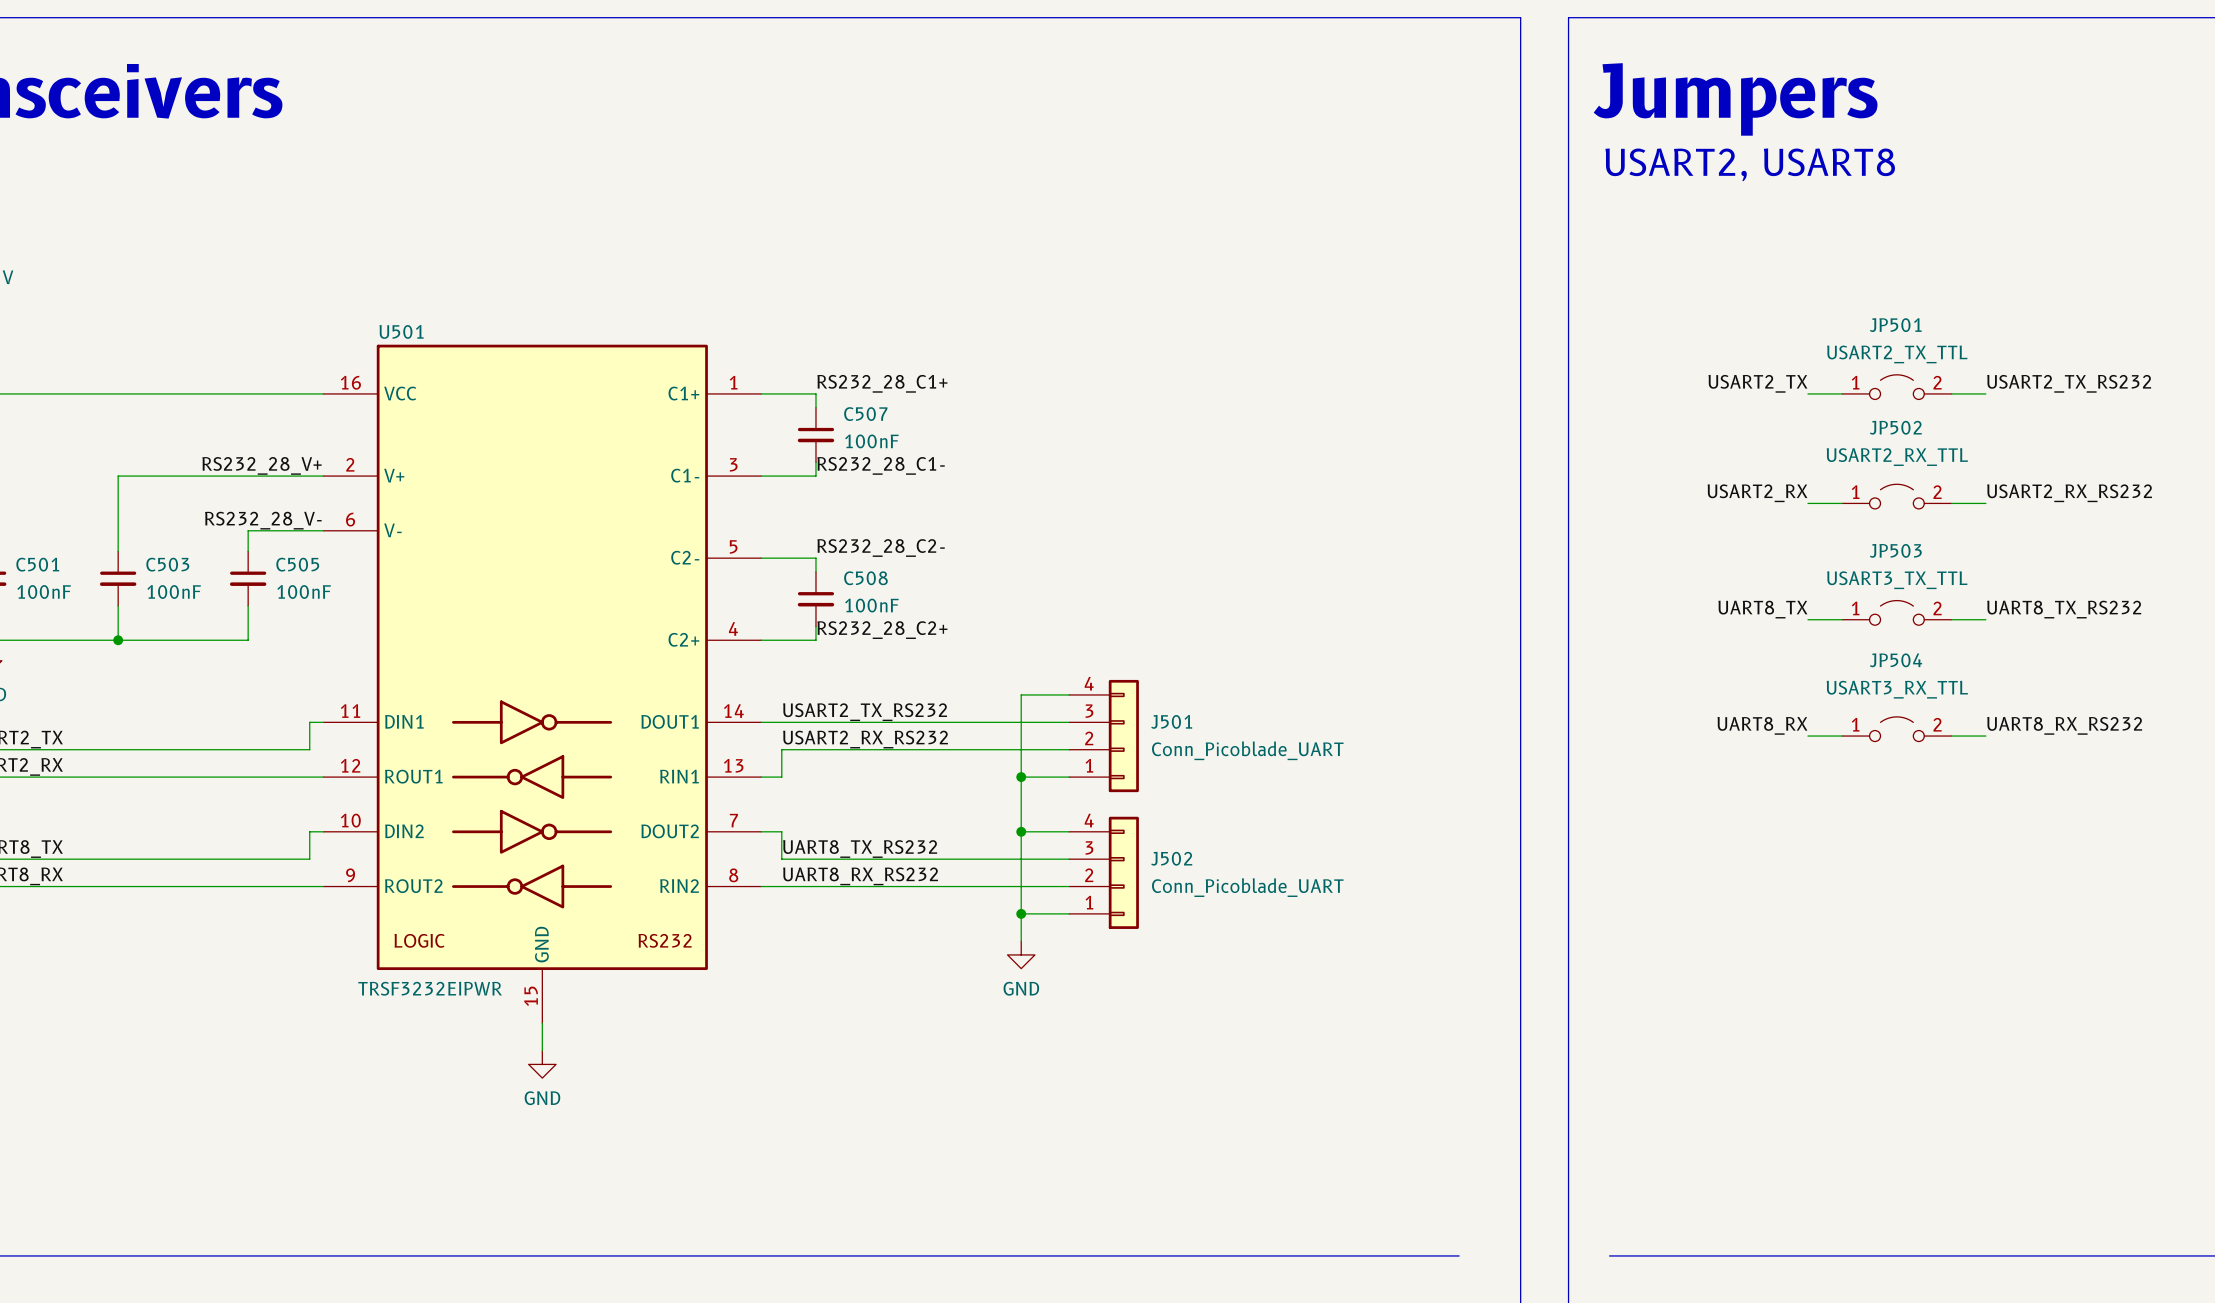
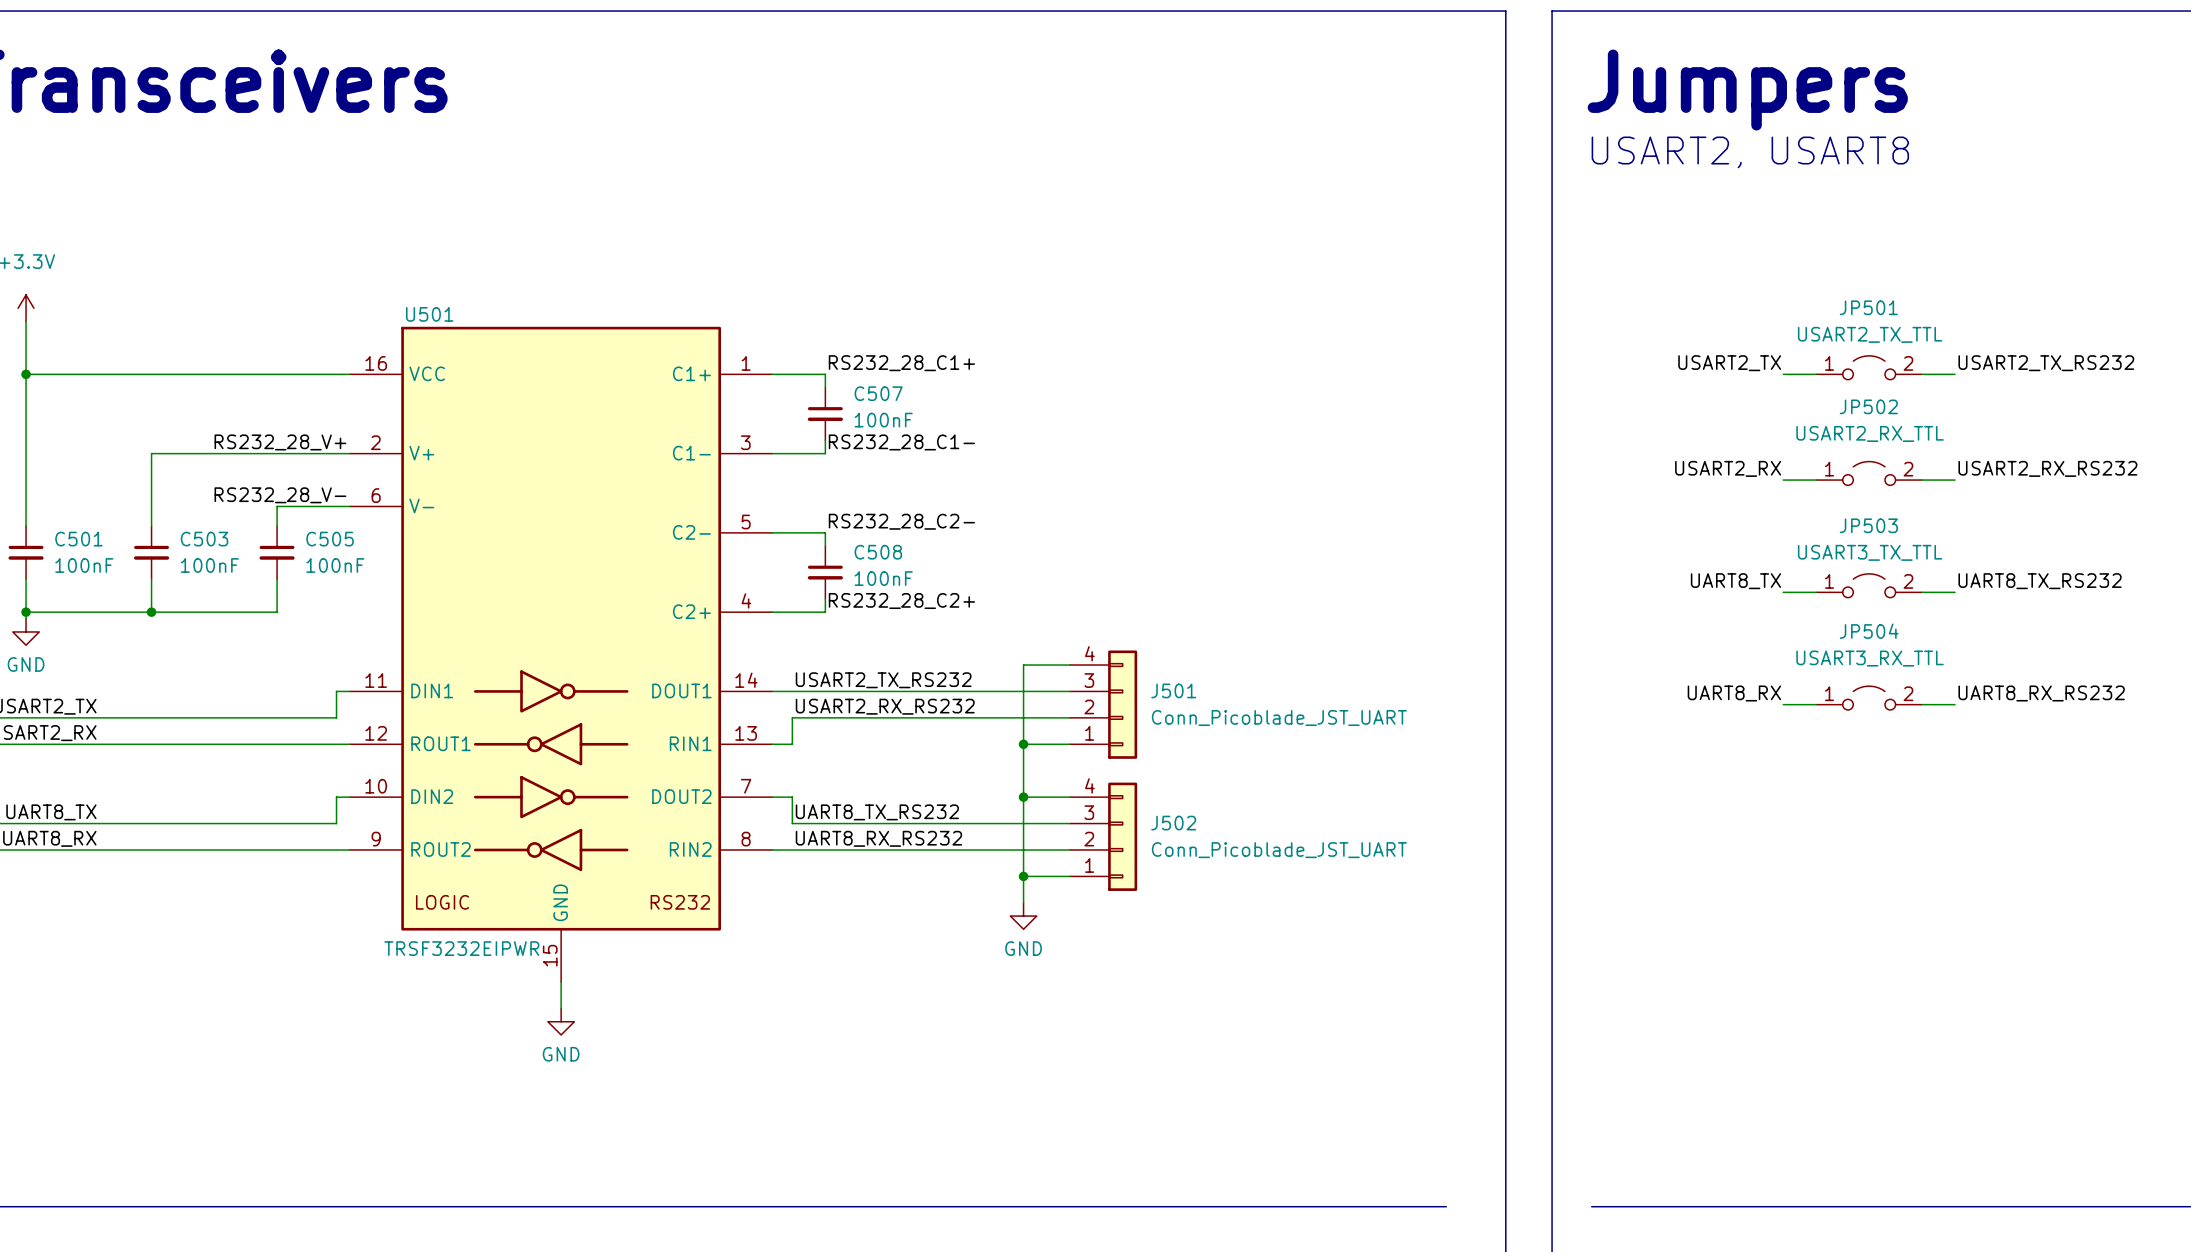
J501 value: Conn_Picoblade_UART (1247, 750) -> Conn_Picoblade_JST_UART (1279, 718)
J502 value: Conn_Picoblade_UART (1247, 887) -> Conn_Picoblade_JST_UART (1279, 850)

